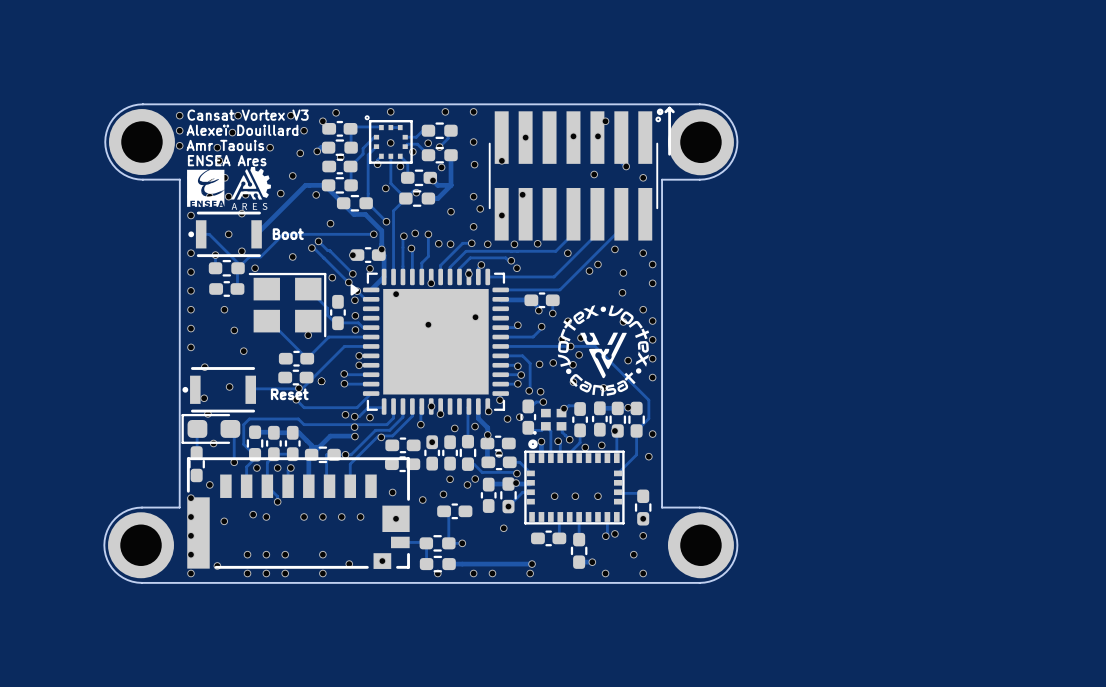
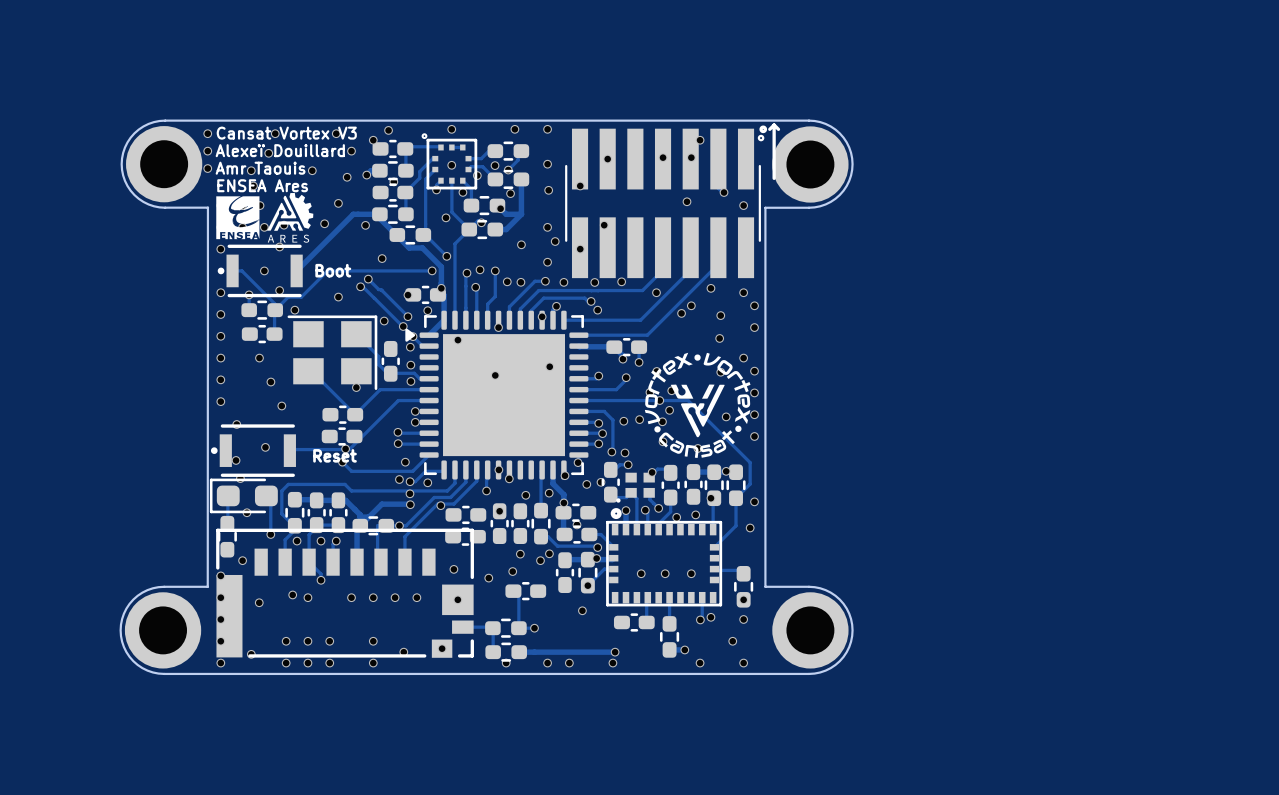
via position: (321, 381) -> (405, 462)

